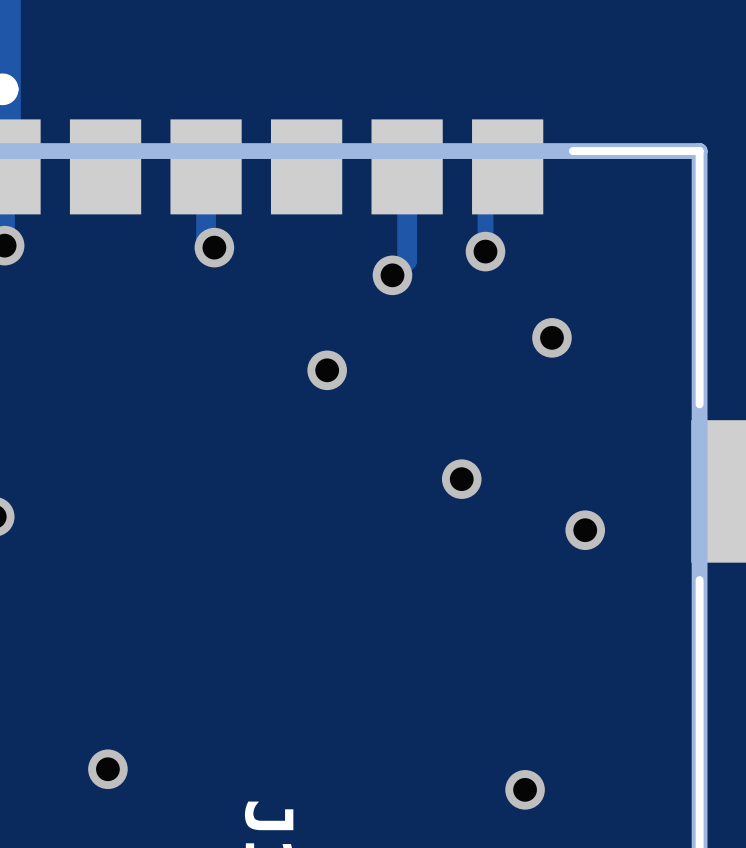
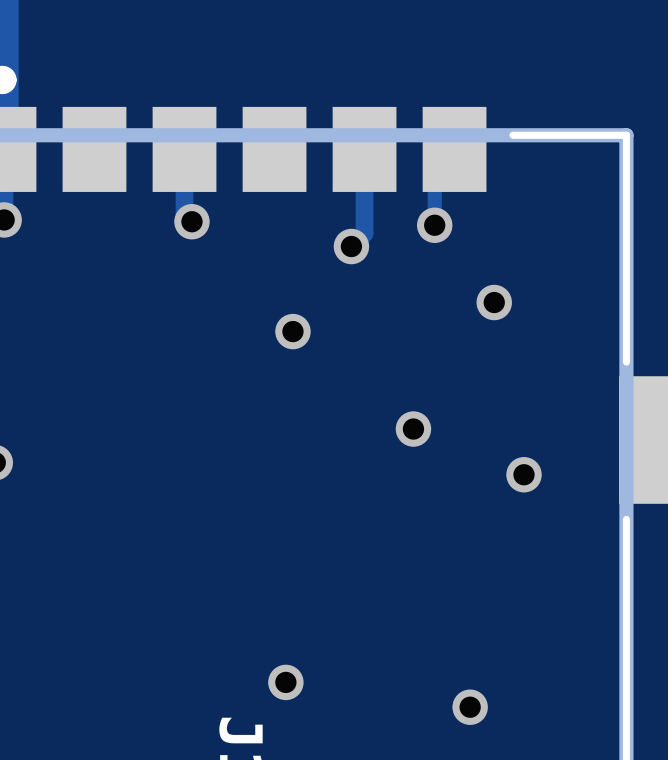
via: none -> (285, 682)
via: (107, 769) -> none

